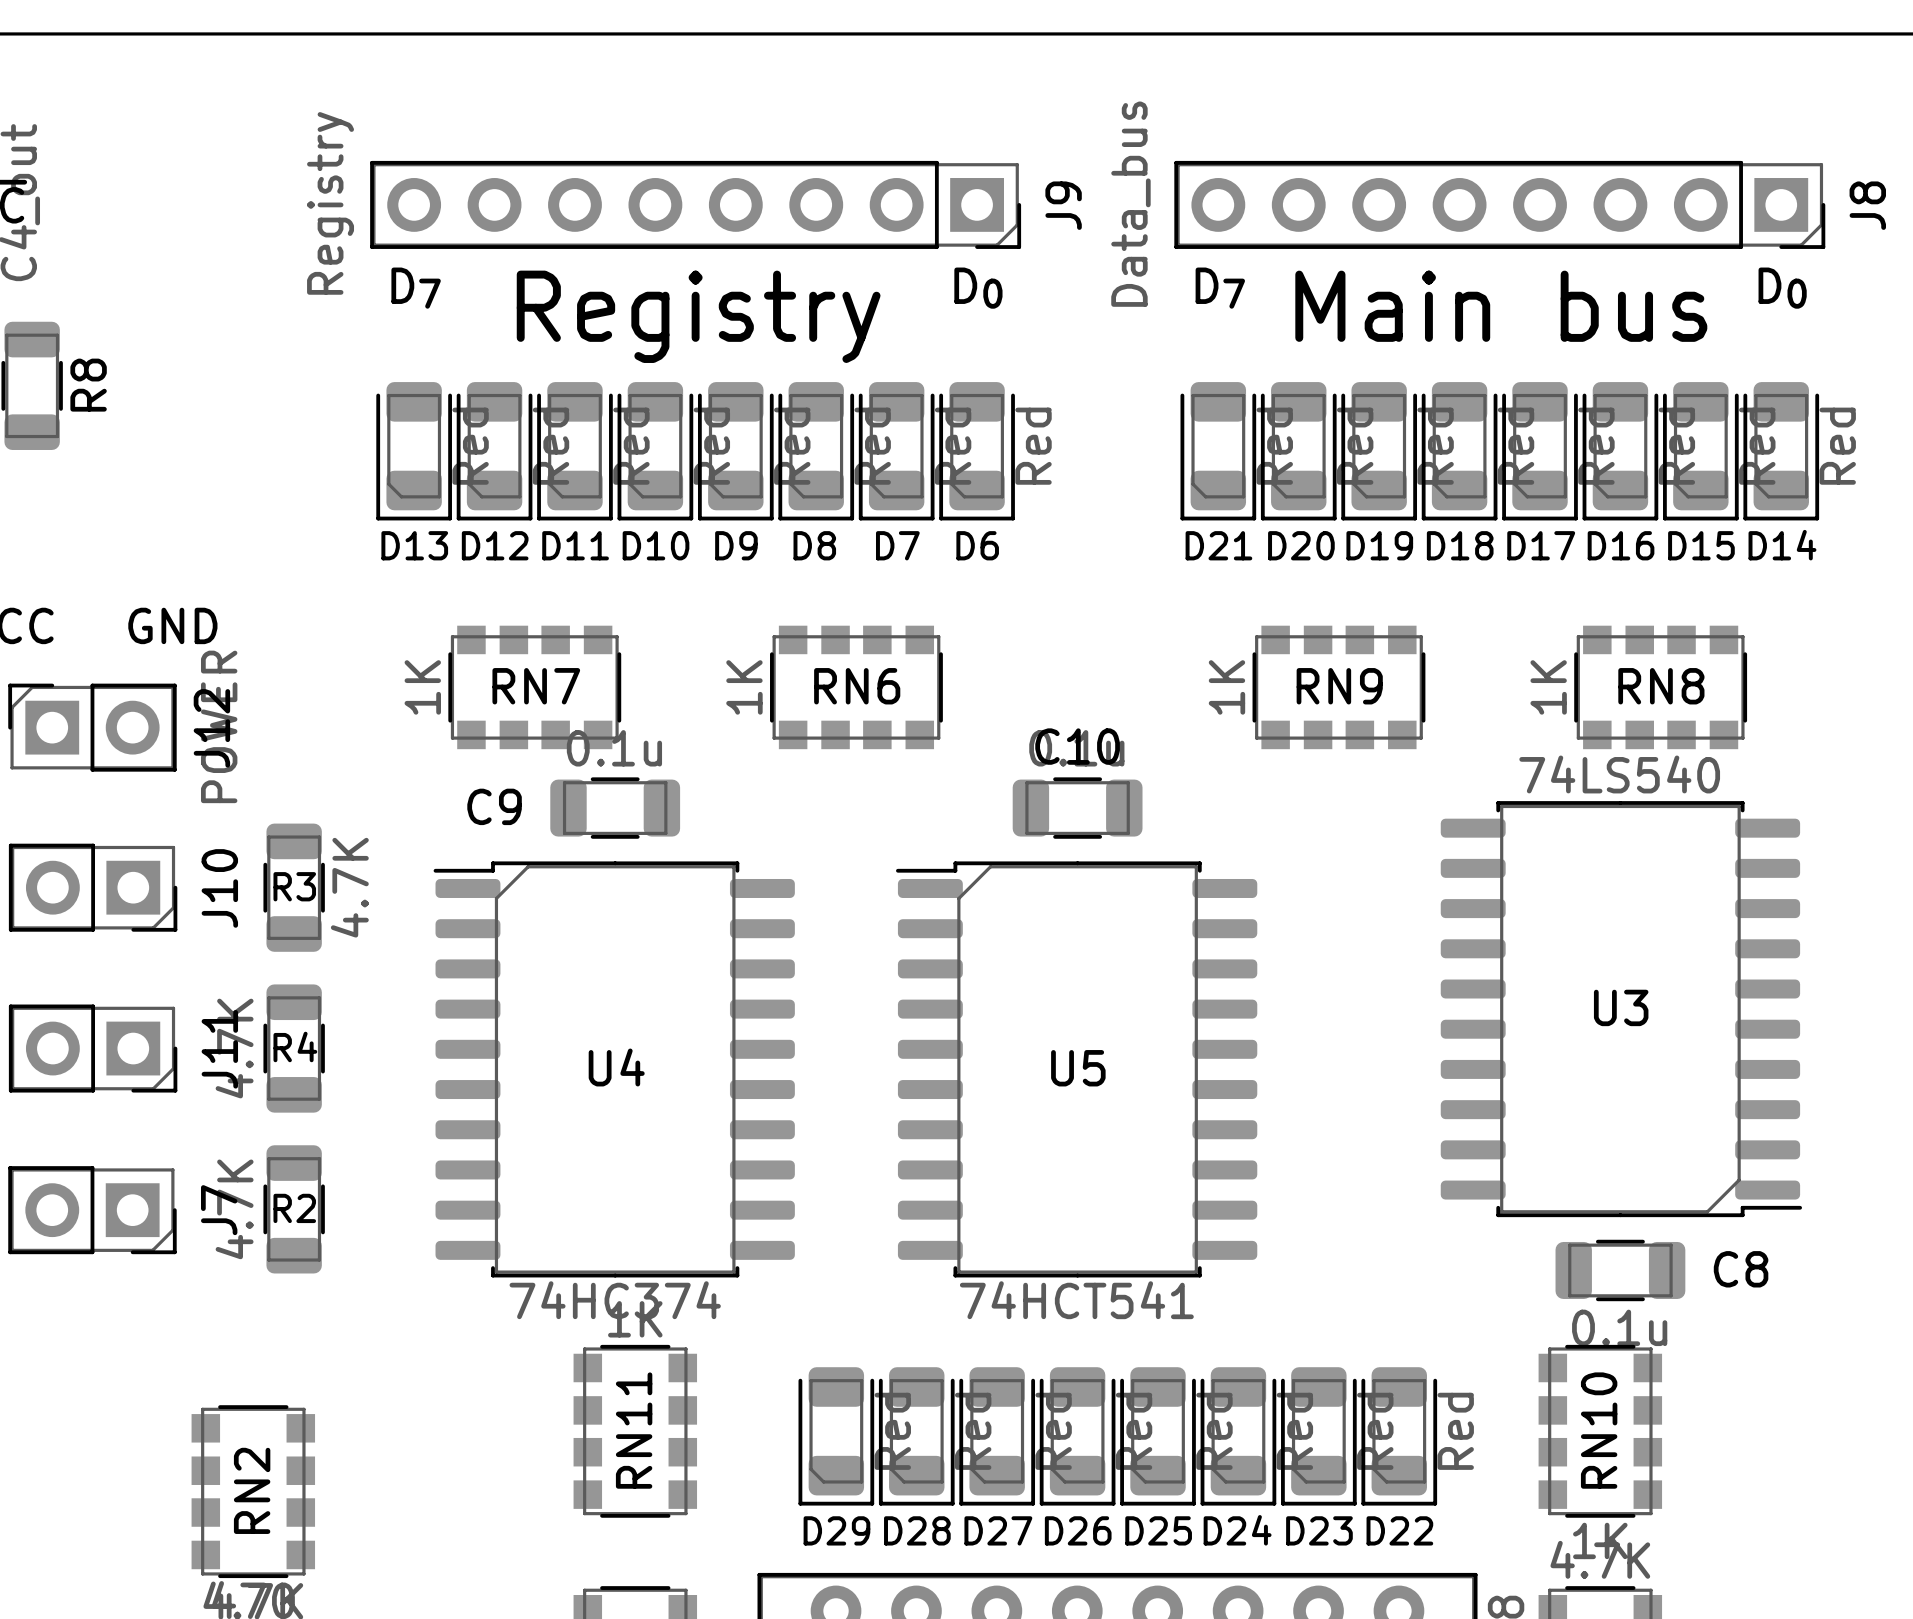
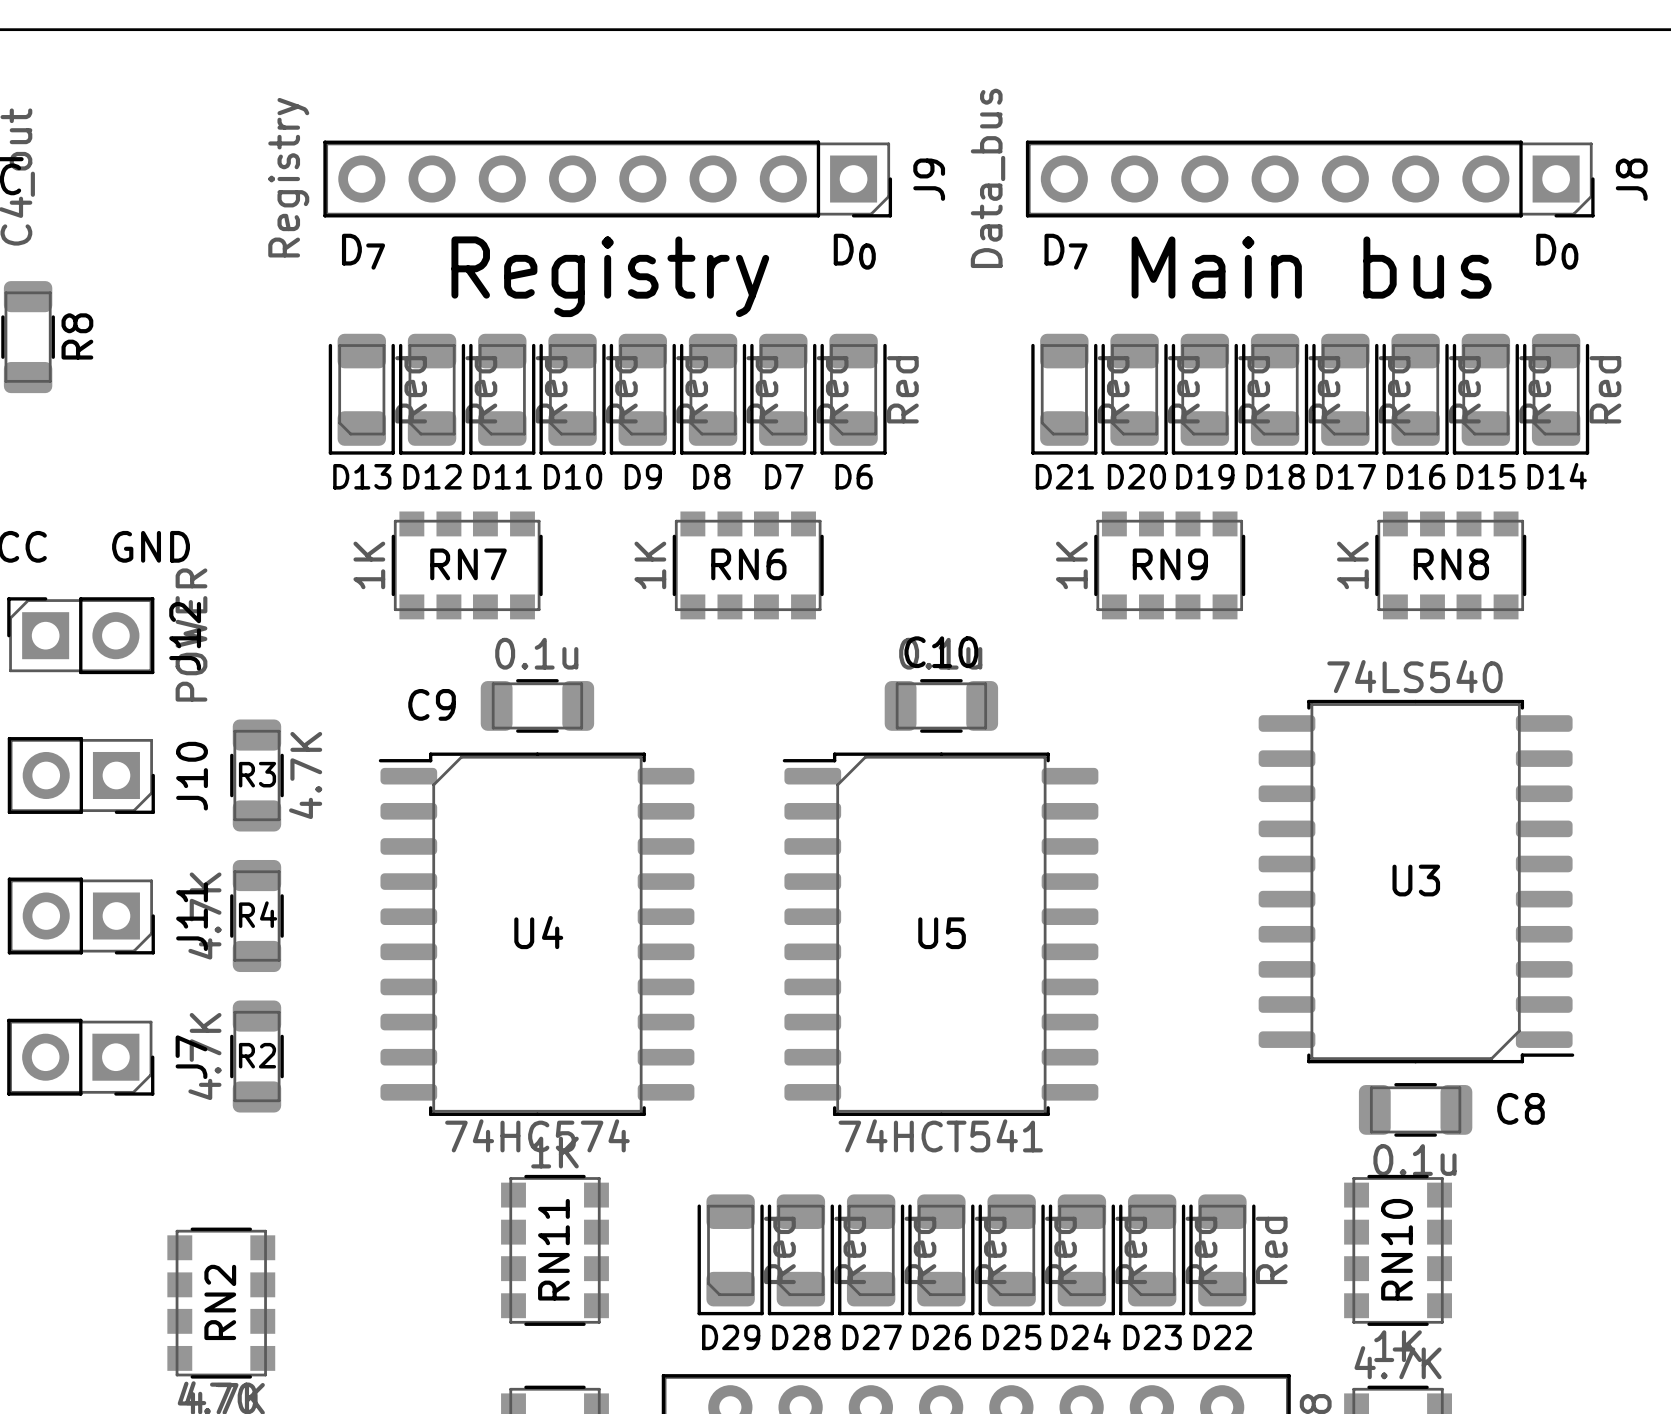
RN7 position: (534, 687) -> (467, 565)
RN6 position: (856, 687) -> (748, 565)
RN9 position: (1338, 687) -> (1169, 565)
RN8 position: (1660, 687) -> (1450, 565)
U4 value: 74HC374 (615, 1300) -> 74HC574 (537, 1135)

